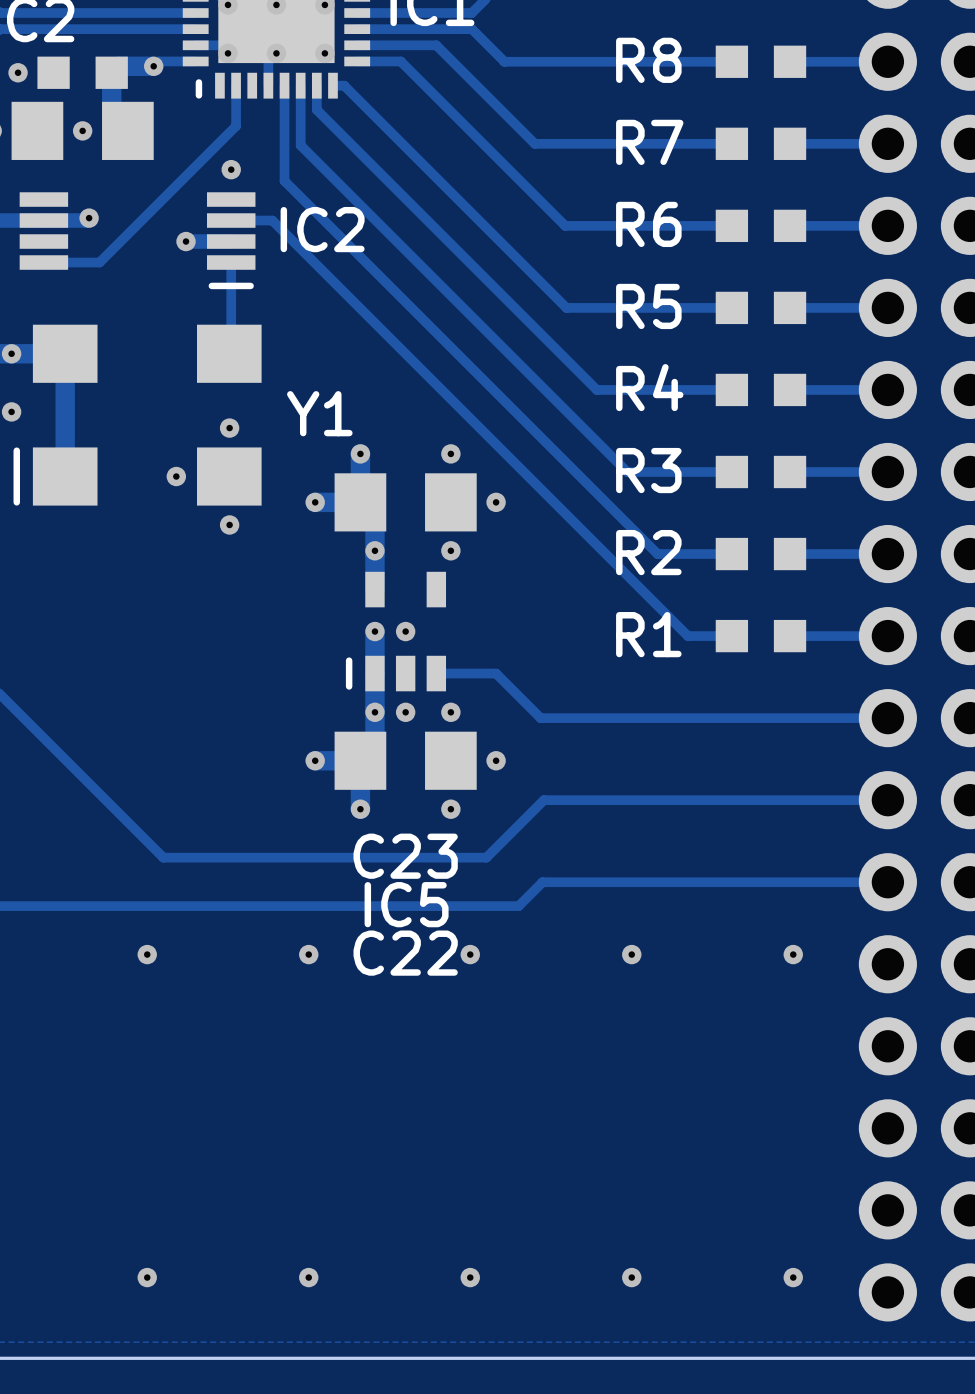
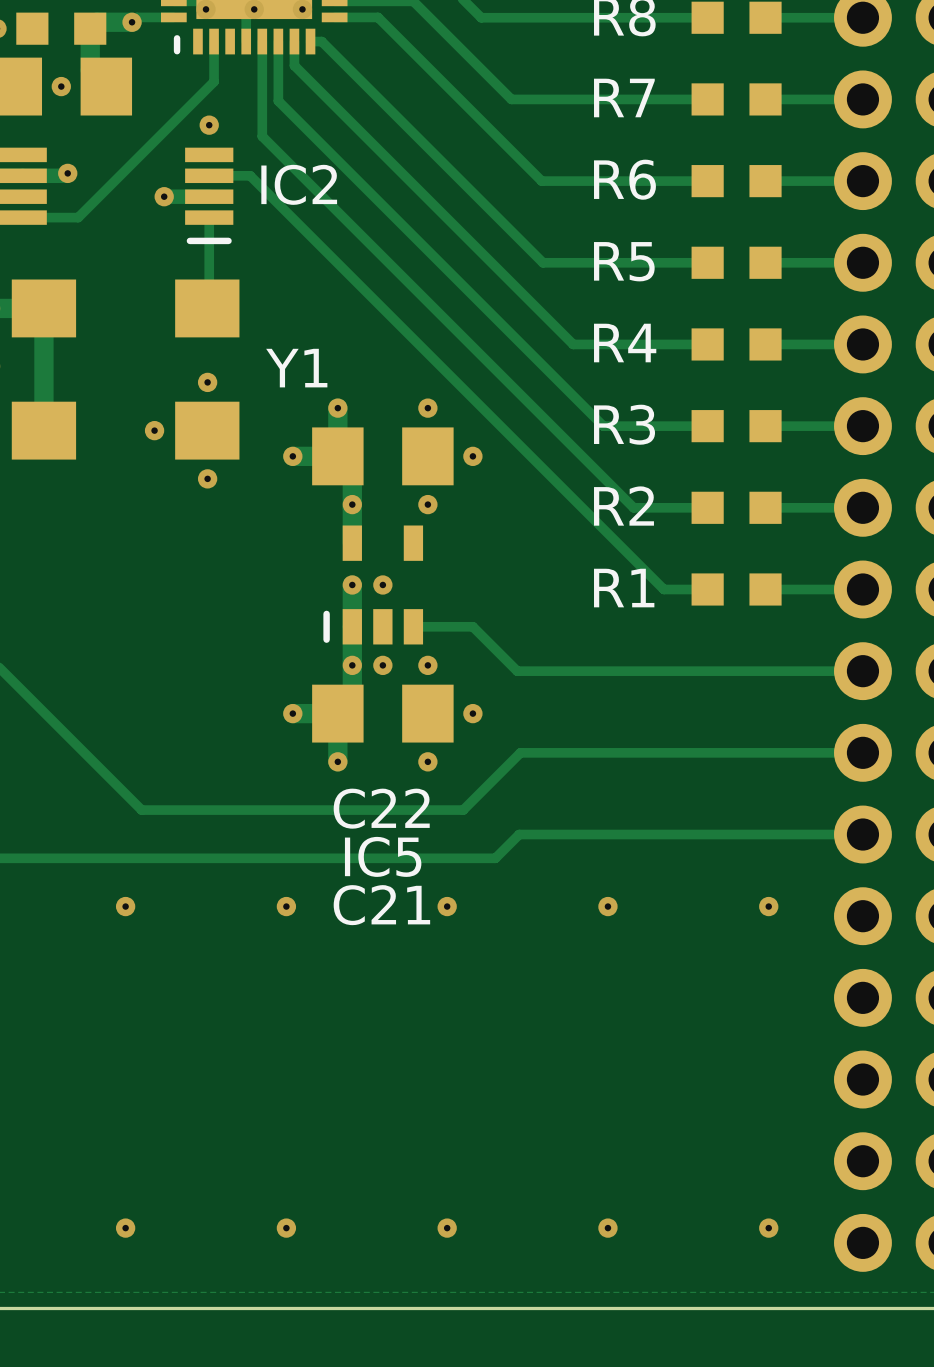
C23 name: C23 (405, 856) -> C22 (381, 808)
C22 name: C22 (405, 953) -> C21 (381, 905)

